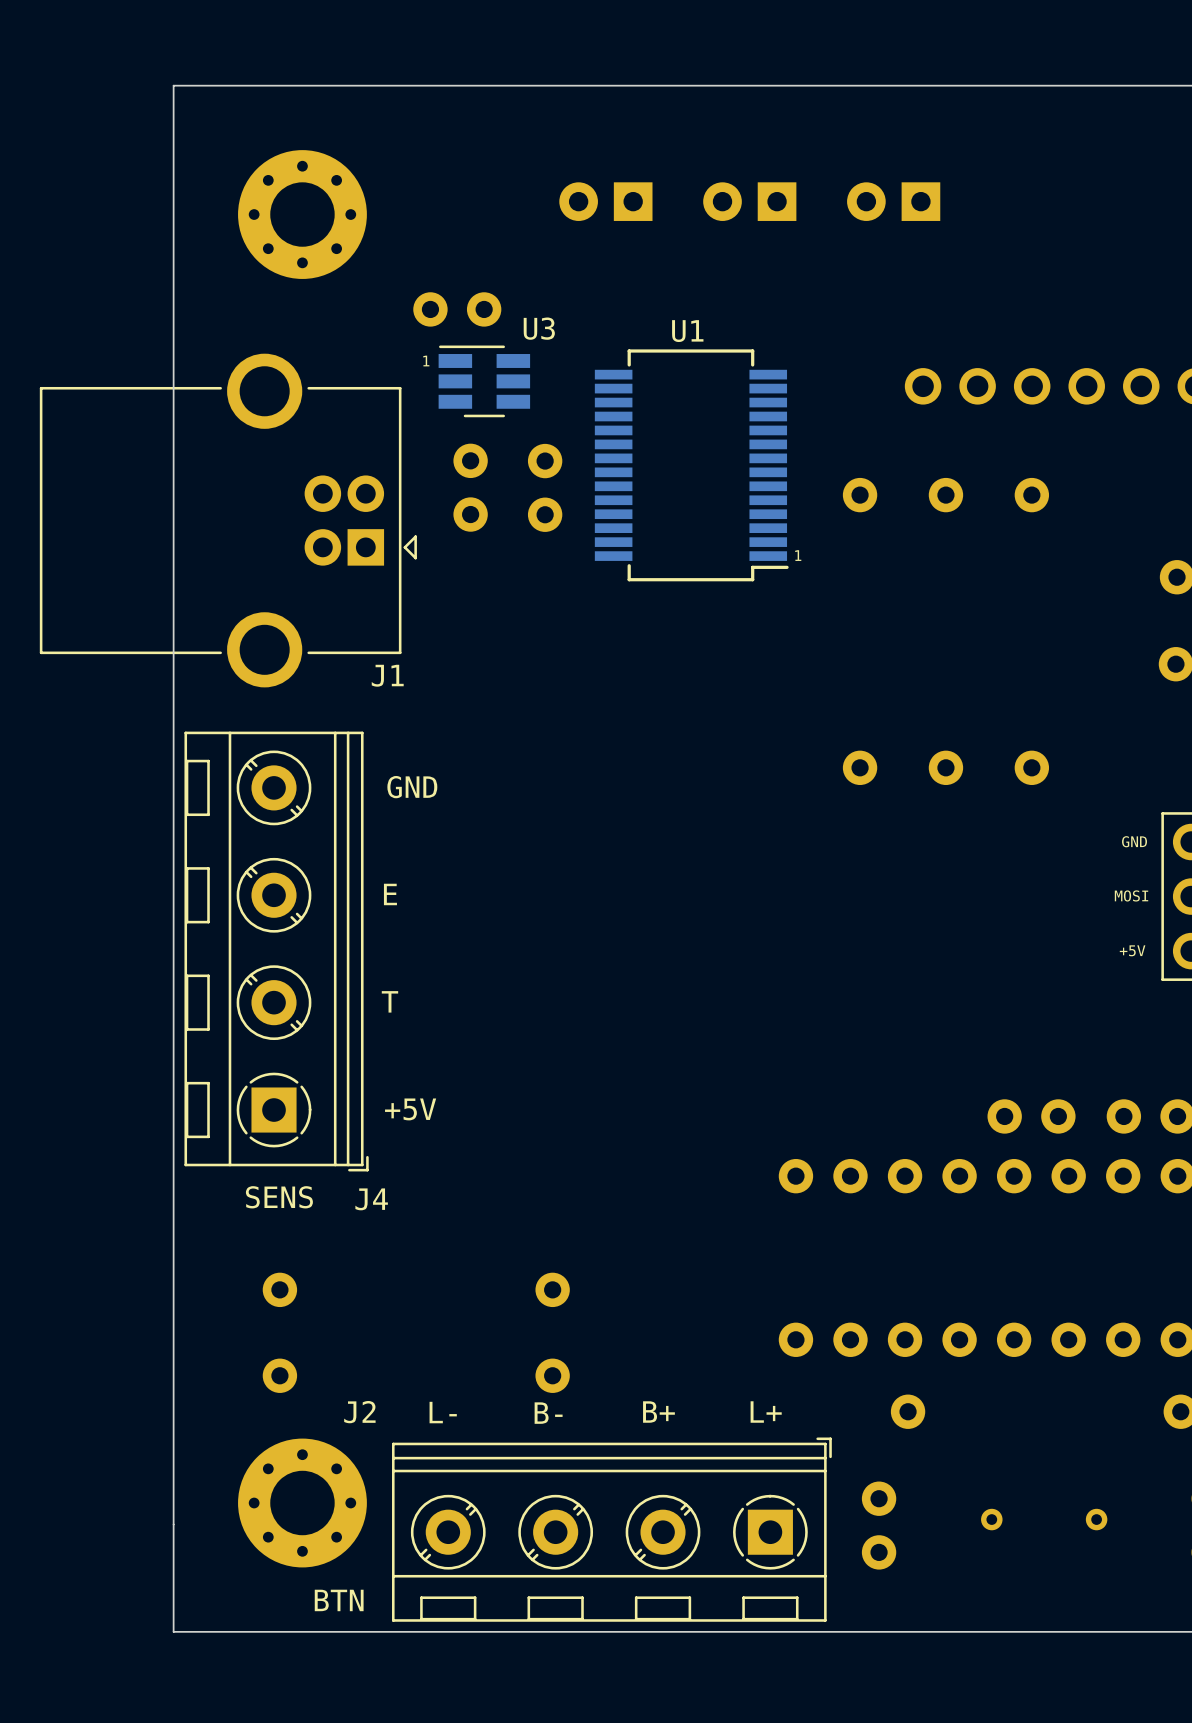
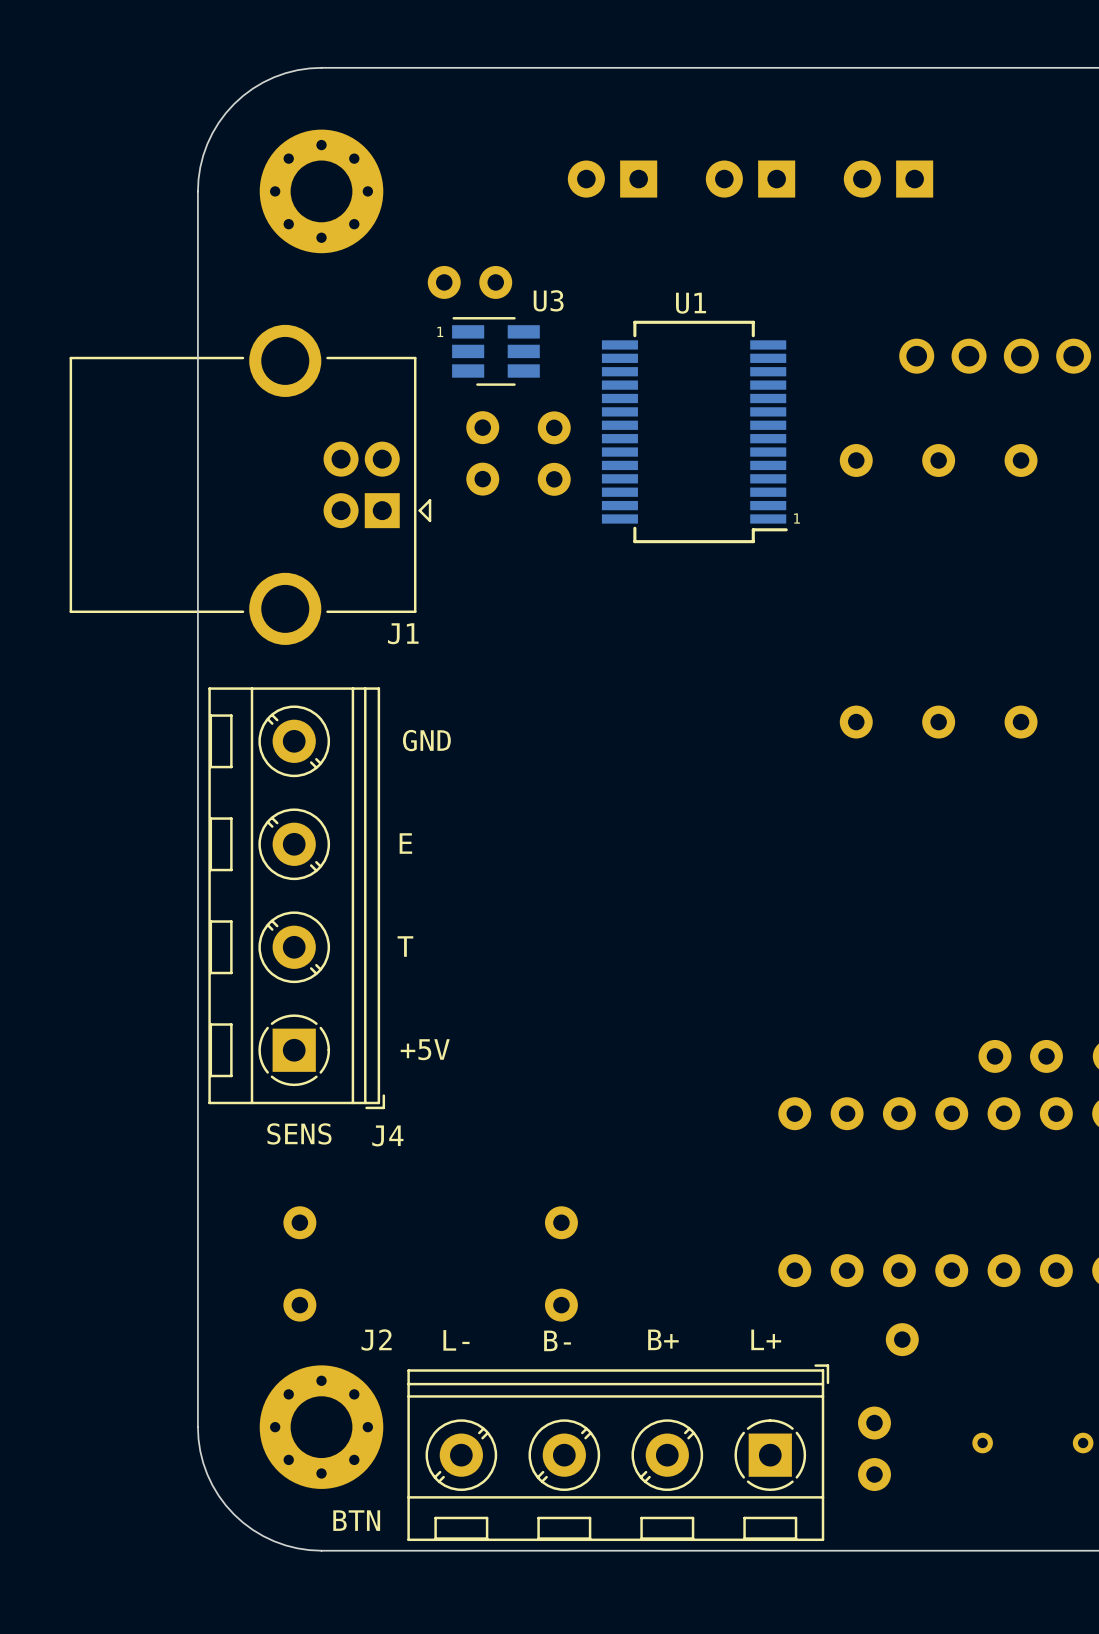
board edge: (302, 85) (173, 85) (173, 214) -> (321, 67) (297, 70) (274, 77) (252, 88) (234, 104) (218, 122) (207, 144) (200, 167) (197, 191)
board edge: (173, 1503) (173, 1631) (302, 1631) -> (197, 1427) (200, 1451) (207, 1474) (218, 1495) (234, 1514) (252, 1529) (274, 1541) (297, 1548) (321, 1550)

